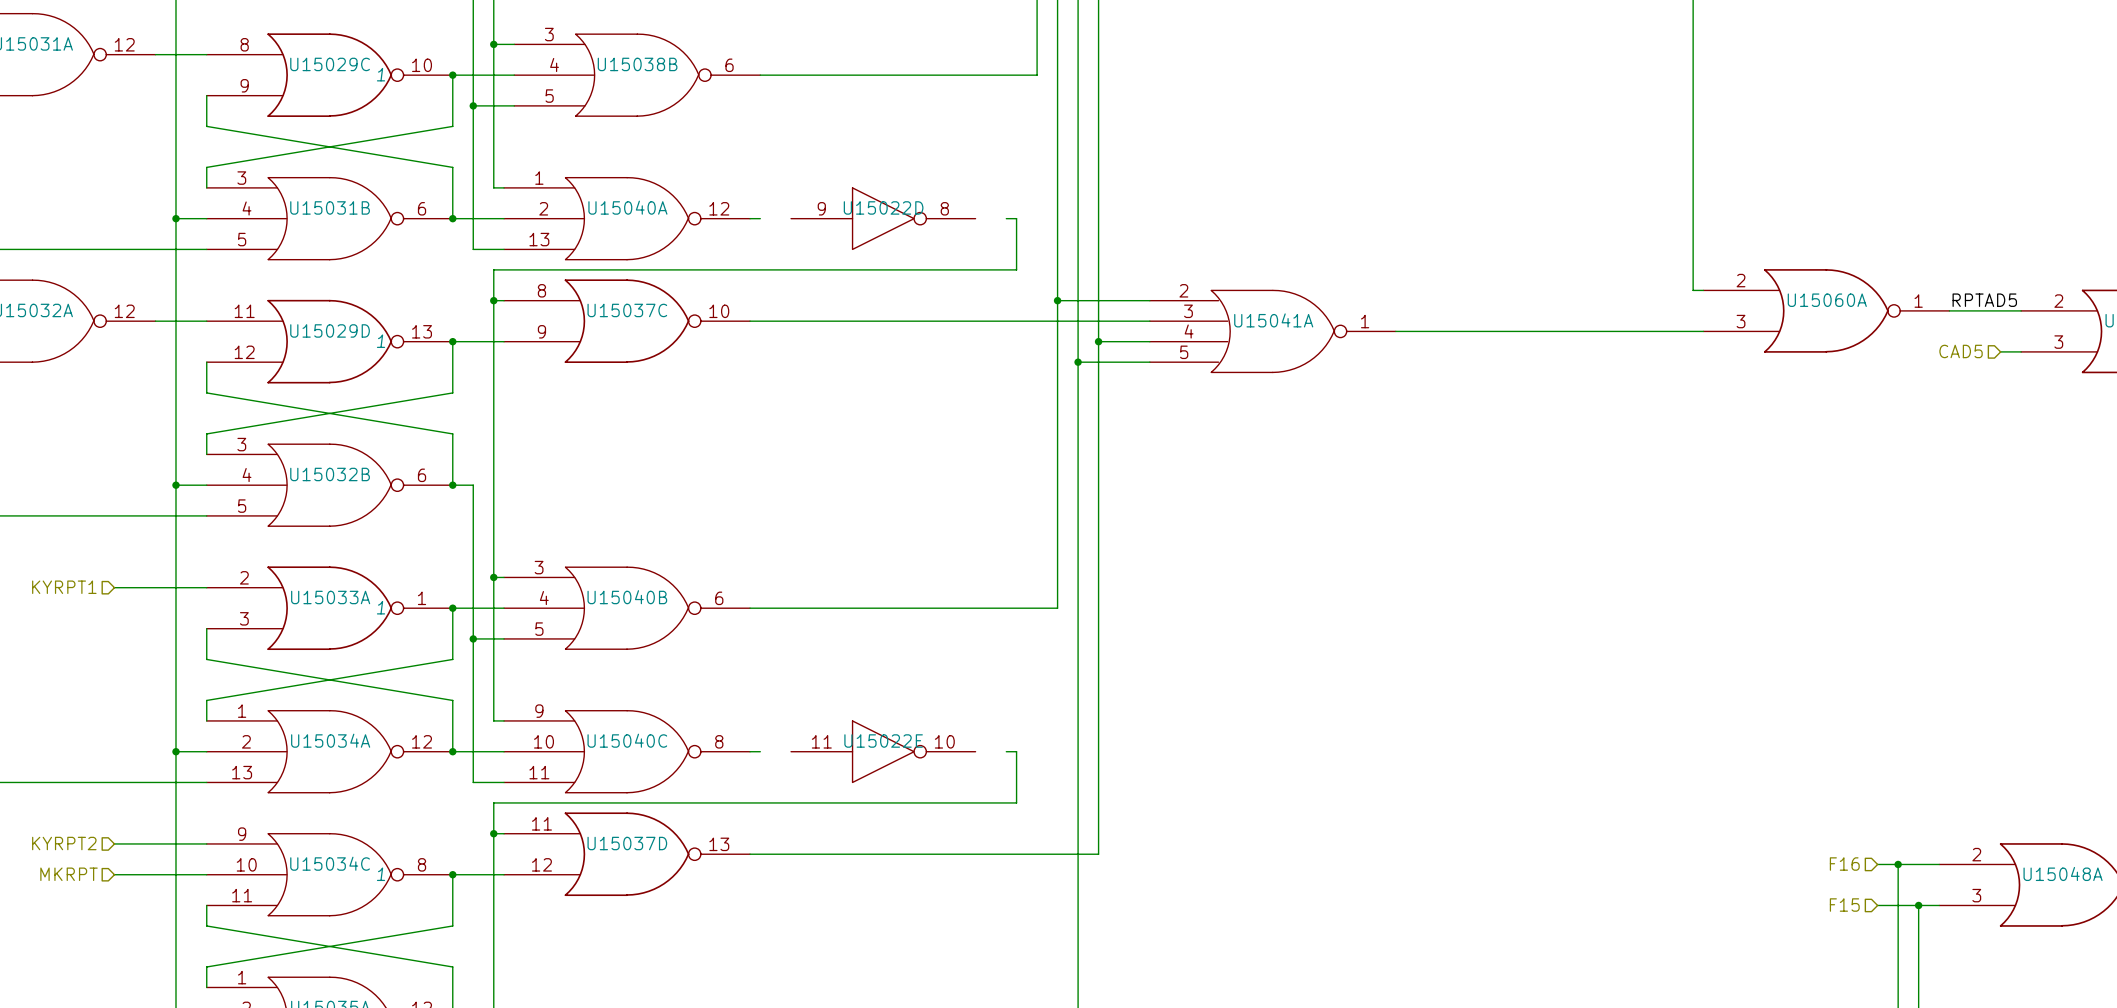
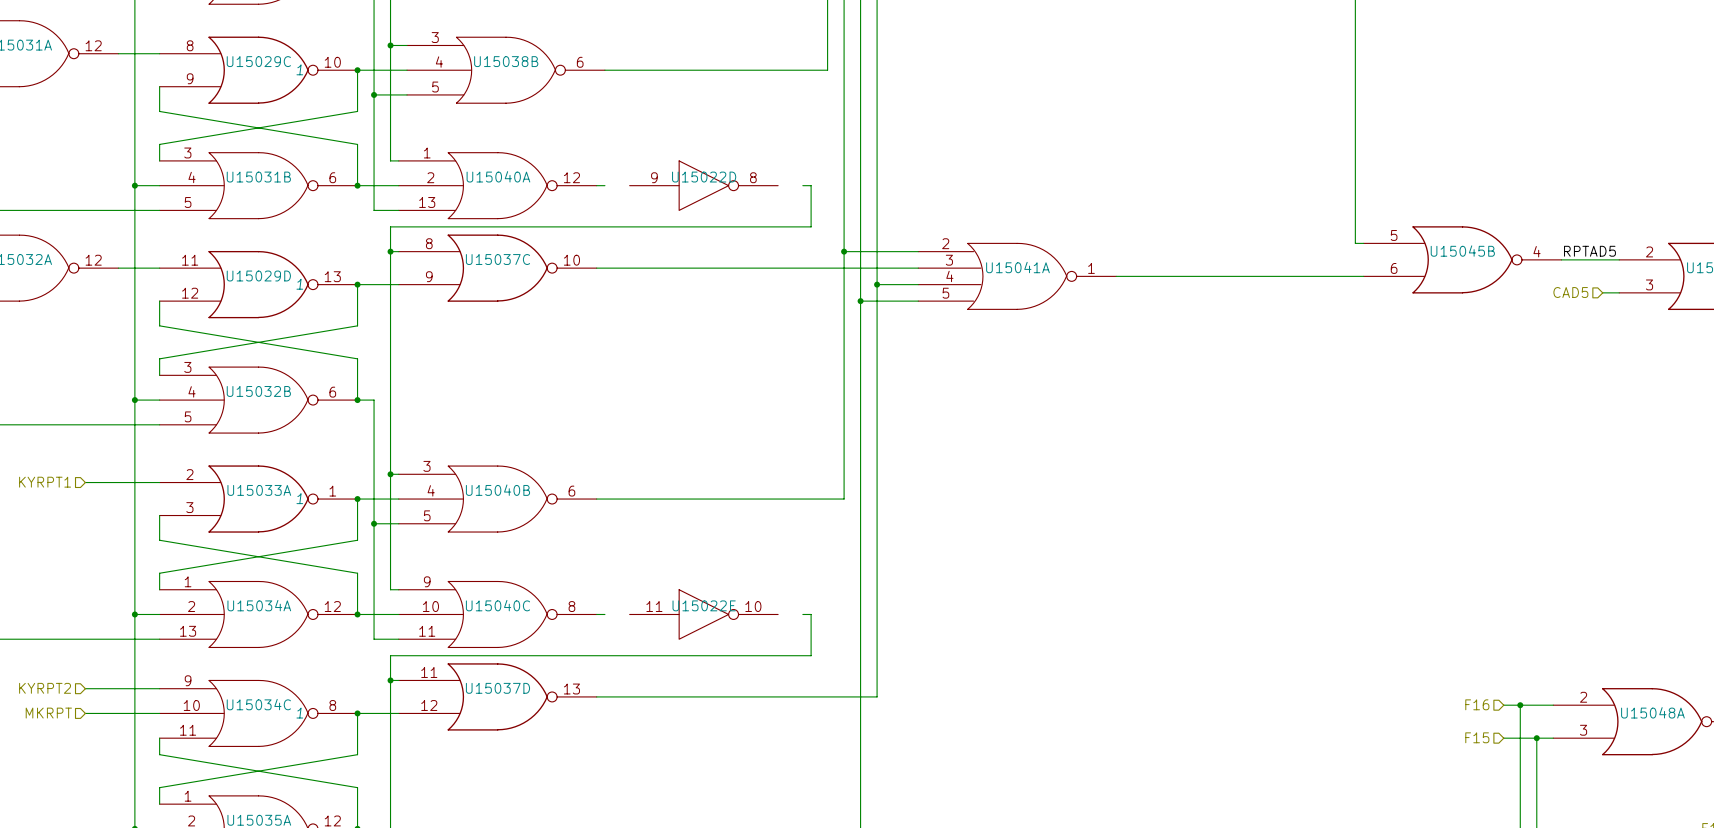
U15060A pin number: 2 (1741, 280) -> 5 (1394, 235)
U15060A name: U15060A (1827, 300) -> U15045B (1462, 251)
U15060A pin number: 1 (1918, 301) -> 4 (1537, 251)
U15060A pin number: 3 (1741, 321) -> 6 (1394, 268)

